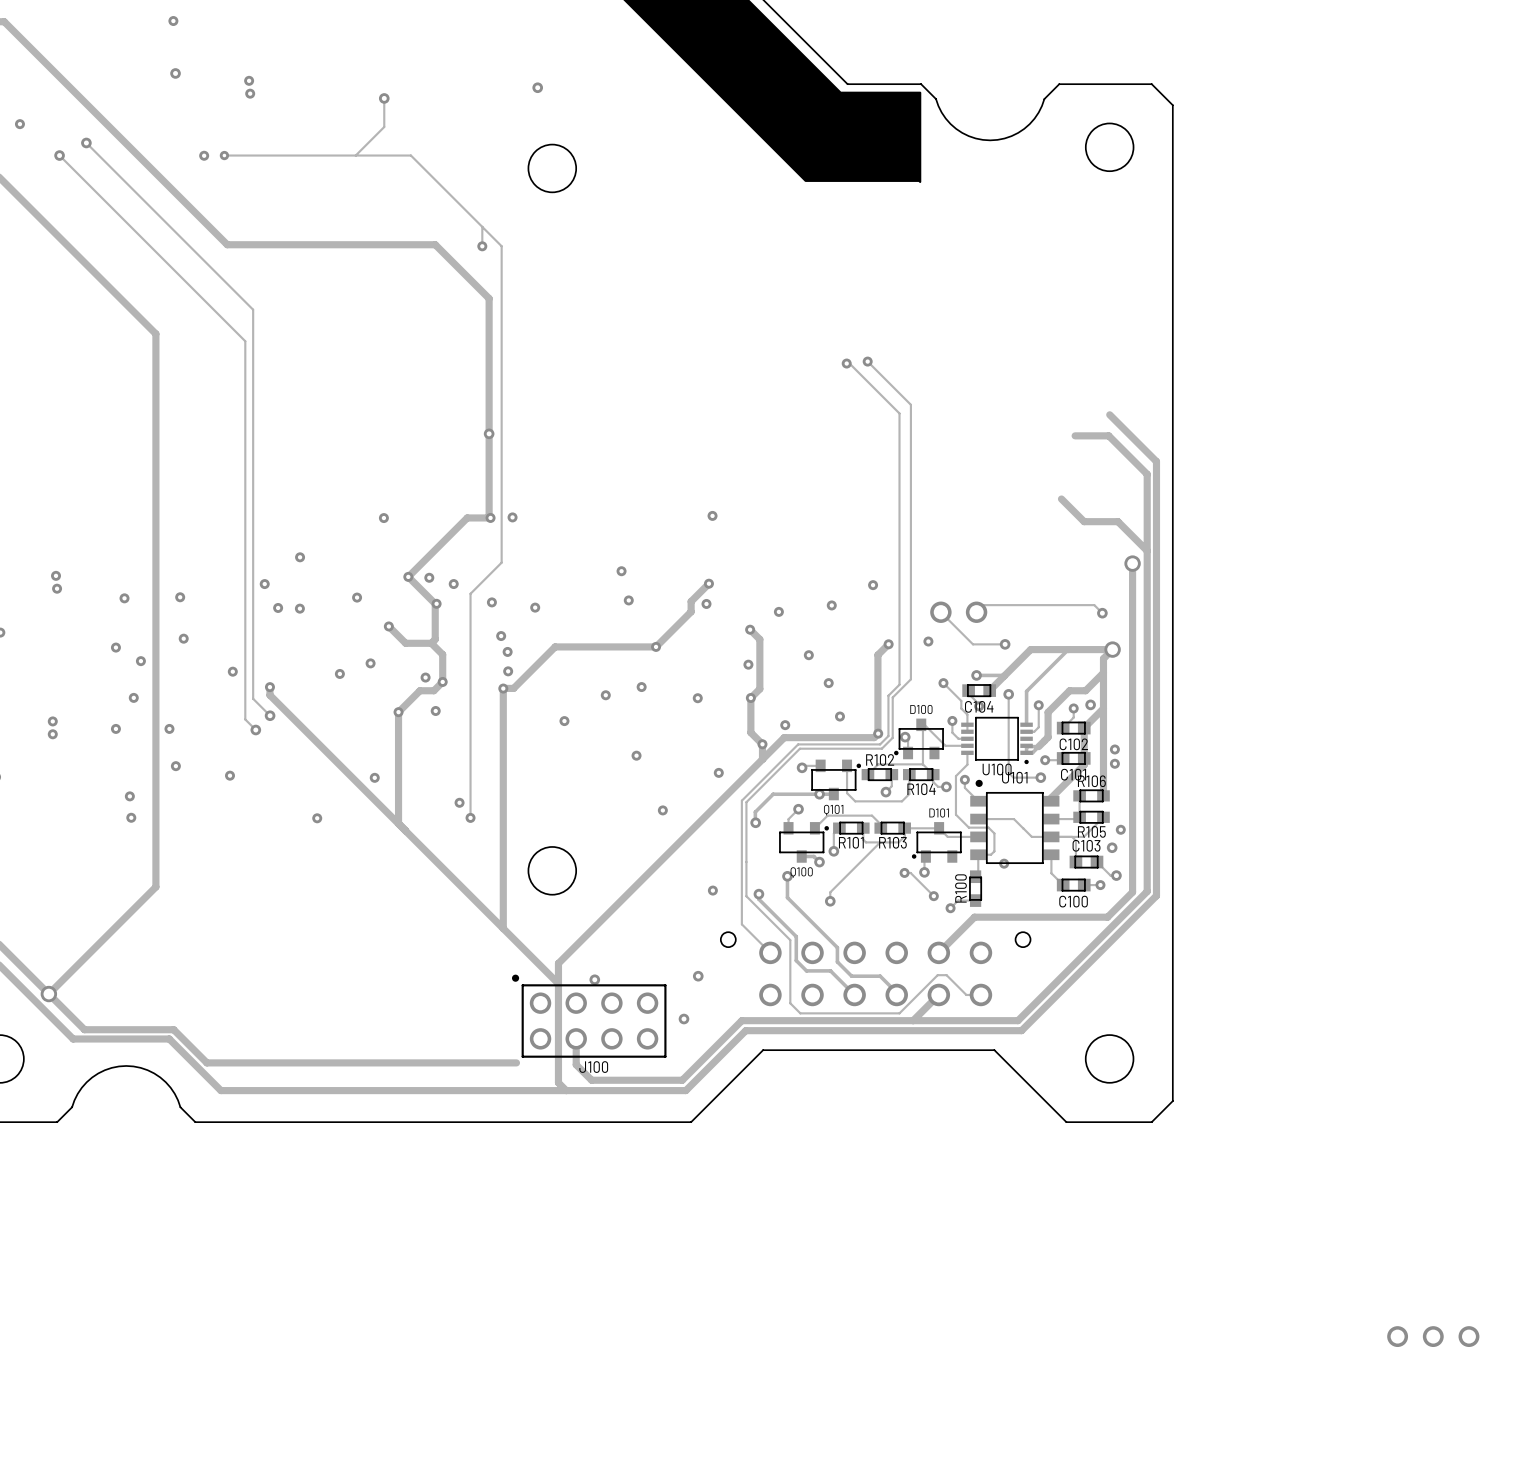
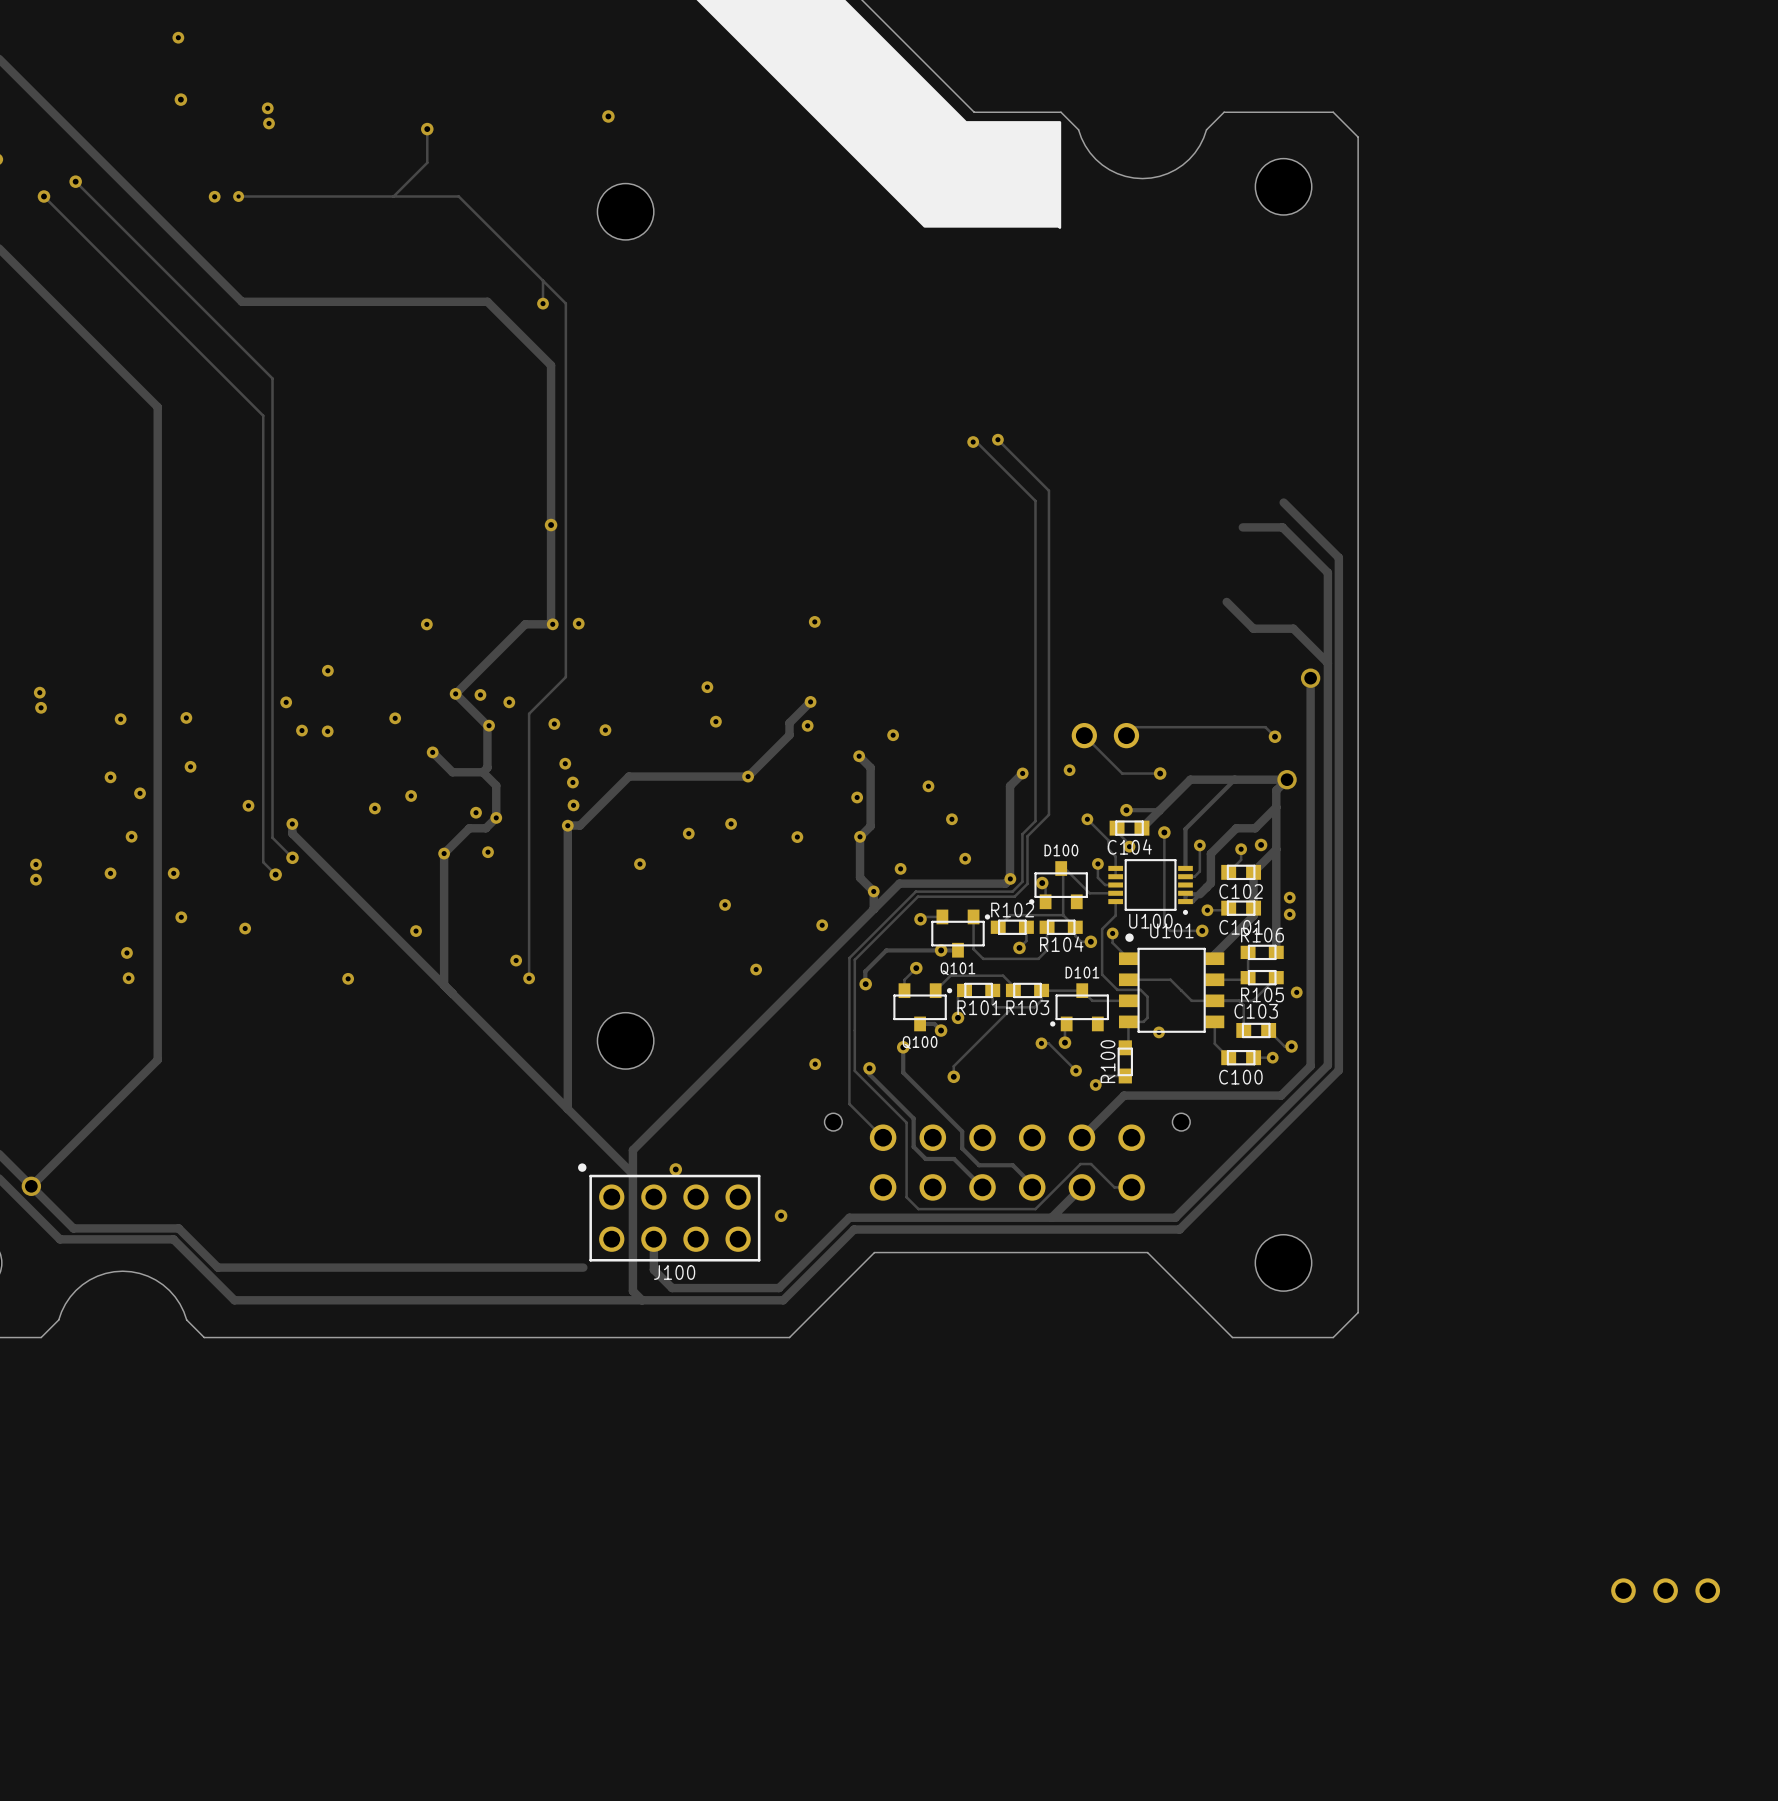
via: (873, 585) -> none
via: (831, 605) -> none
via: (1112, 847) -> none
via: (698, 976) -> none

